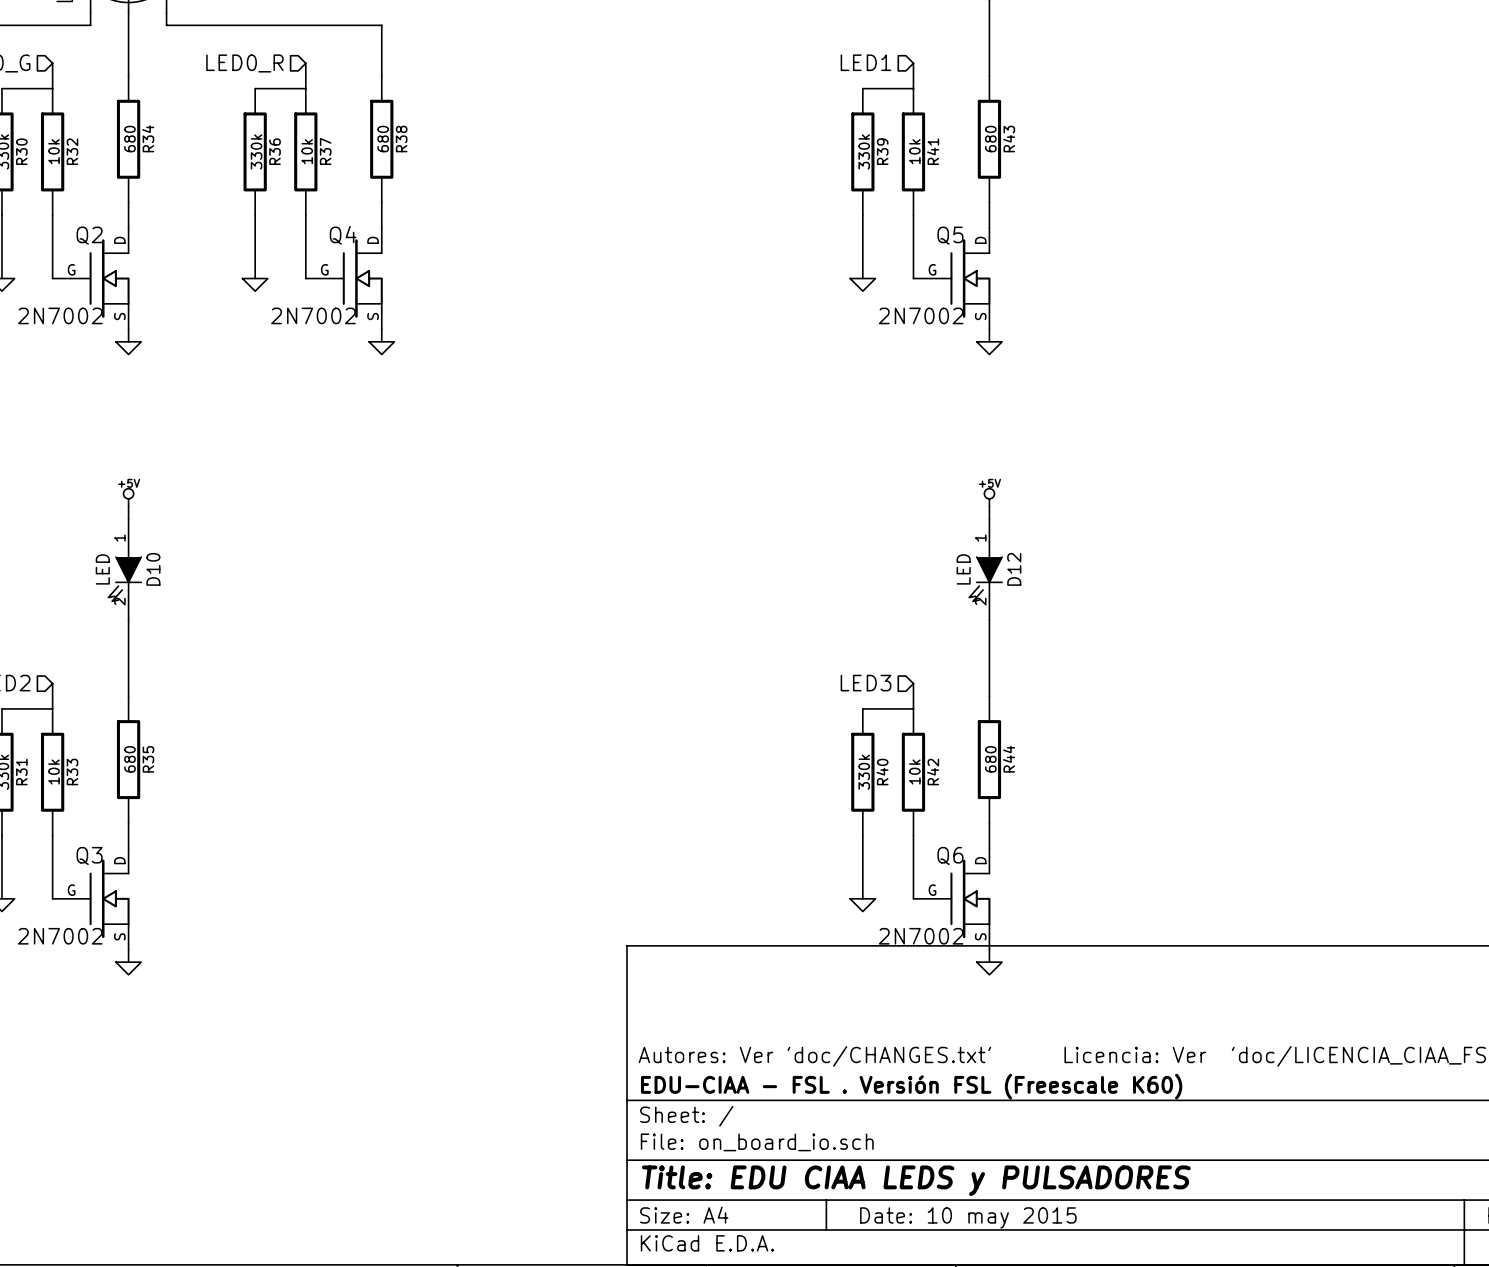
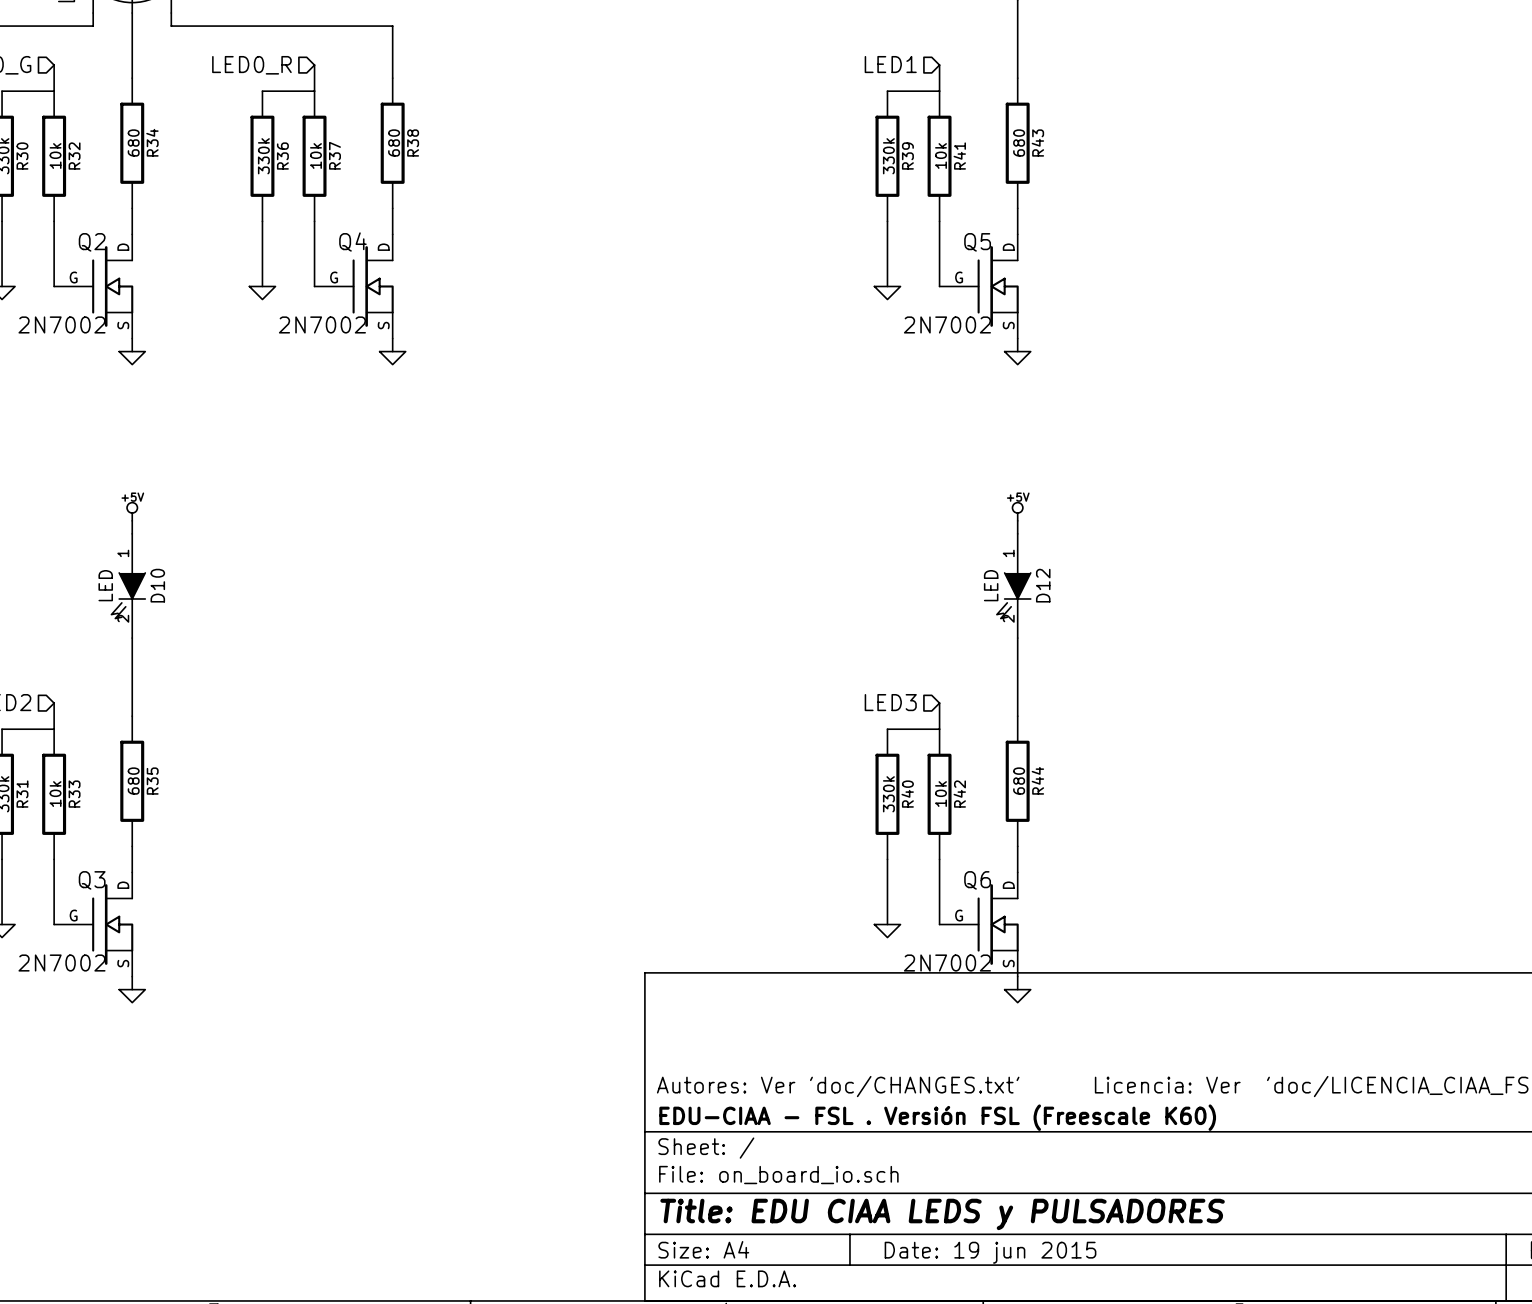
title block: Date: 10 may 2015 (968, 1217) -> Date: 19 jun 2015 (990, 1252)

